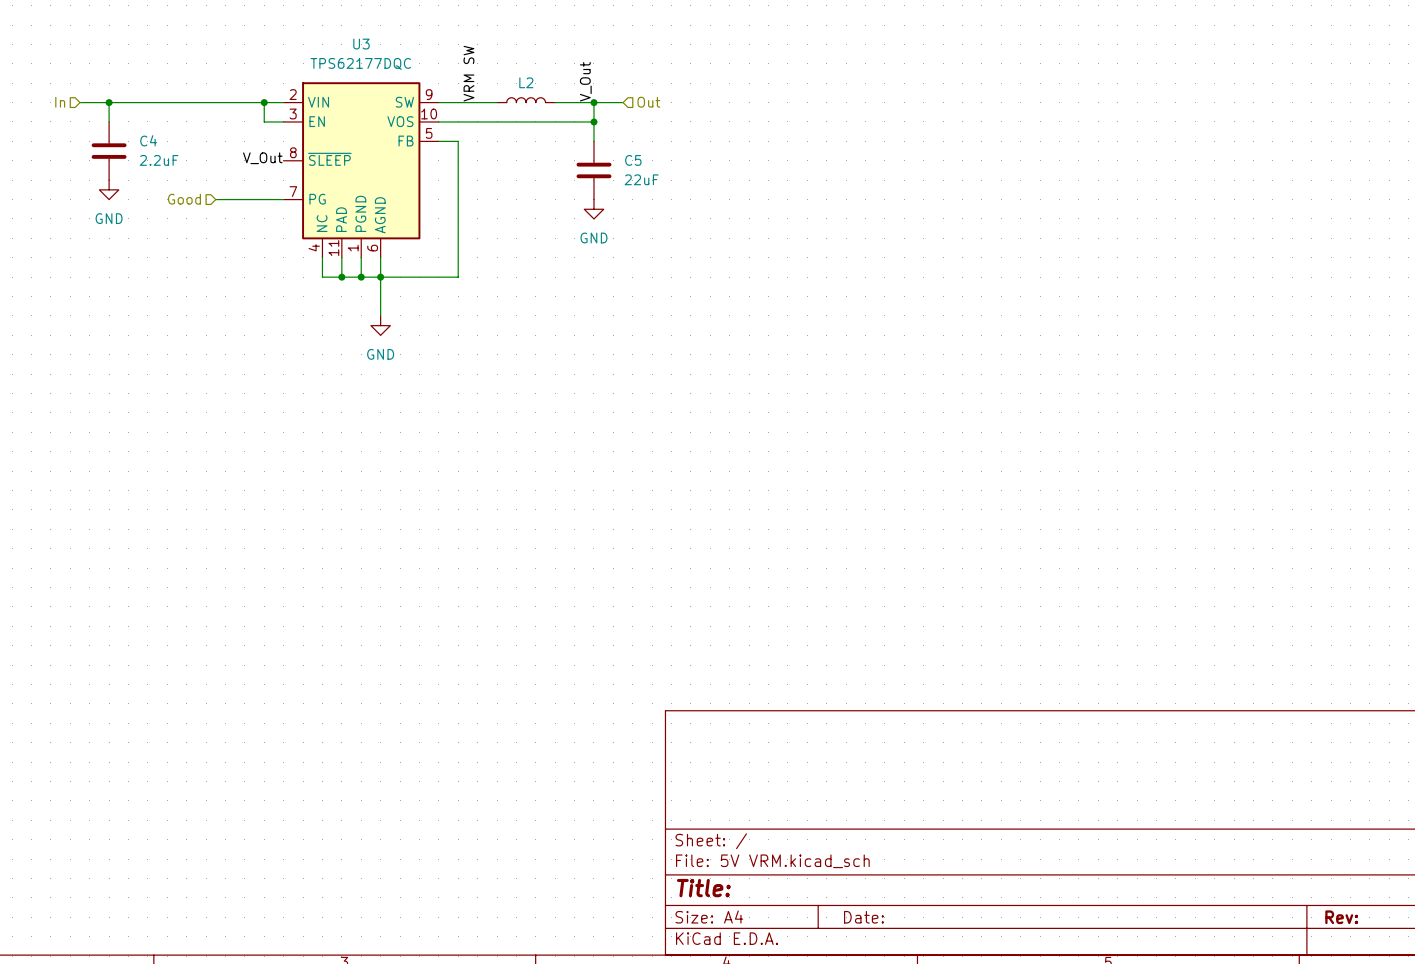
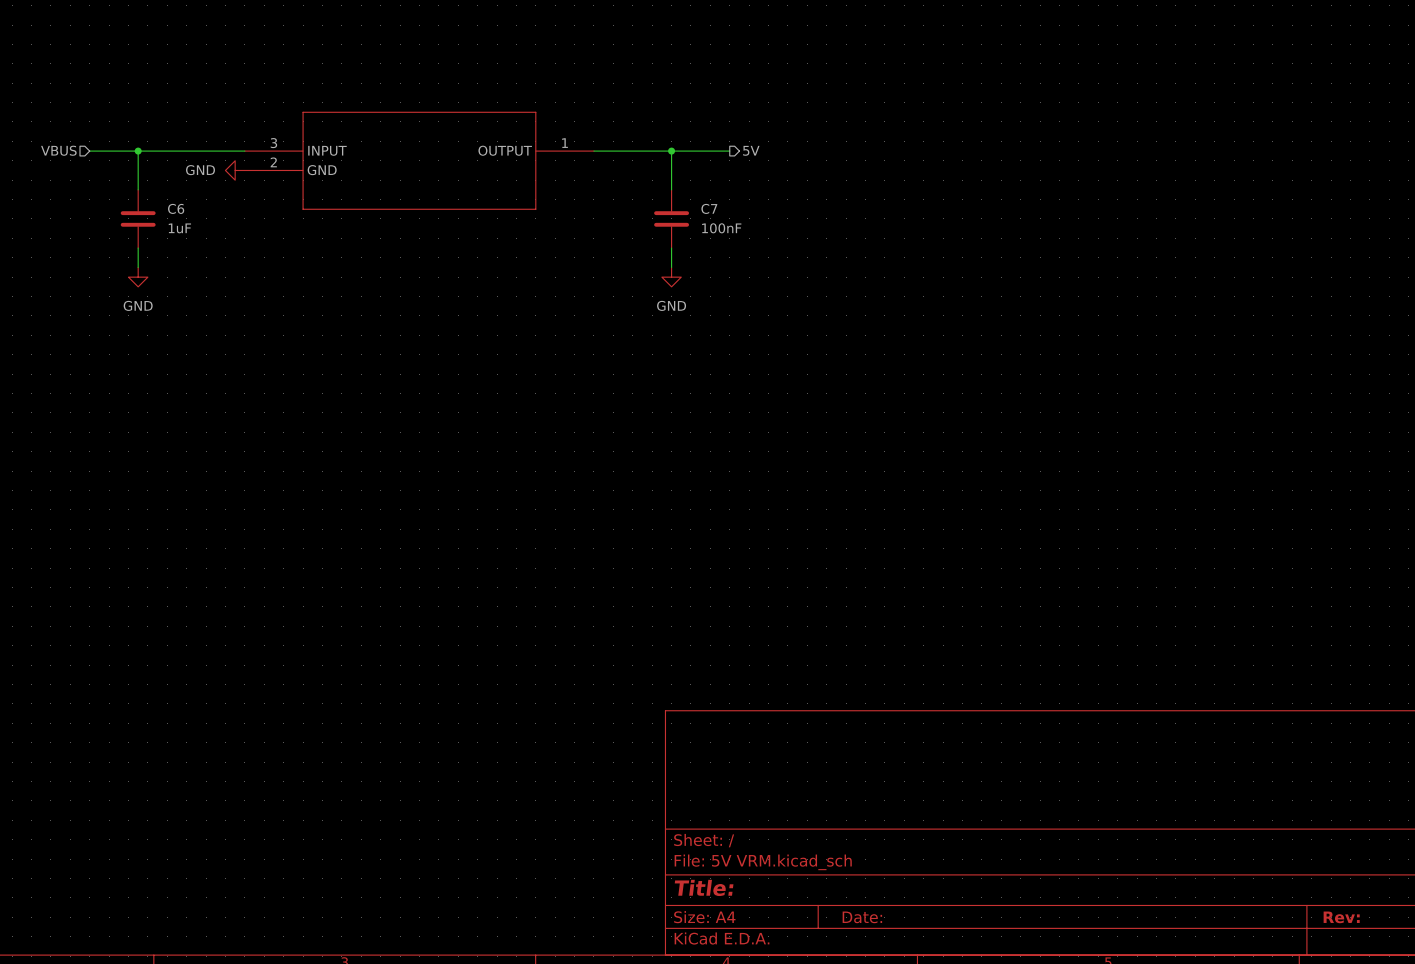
label: VRM SW (468, 73) -> none
label: V_Out (585, 81) -> none
L2: (526, 100) -> none
hierarchical label: In (60, 102) -> none
wire: (79, 102) (283, 102) -> none
wire: (109, 102) (109, 121) -> (138, 248) (138, 267)
junction: (109, 102) -> none
wire: (264, 102) (264, 121) (283, 121) -> none
junction: (264, 102) -> none
wire: (438, 102) (497, 102) -> none
wire: (555, 102) (623, 102) -> none
wire: (593, 102) (593, 141) -> (671, 151) (671, 189)
junction: (593, 102) -> none
hierarchical label: Out (648, 102) -> none
wire: (438, 121) (593, 121) -> none
junction: (593, 121) -> none
wire: (438, 141) (458, 141) (458, 277) (322, 277) (322, 257) -> none
hierarchical label: none -> VBUS (58, 150)
hierarchical label: none -> 5V (751, 150)
wire: none -> (89, 151) (244, 151)
C4: 2.2uF (109, 151) -> none
wire: none -> (138, 151) (138, 189)
junction: none -> (138, 151)
wire: none -> (593, 151) (729, 151)
junction: none -> (671, 151)
label: V_Out (262, 158) -> none
part: none -> (419, 160)
U3: TPS62177DQC (361, 169) -> none
power symbol: none -> GND (235, 170)
C5: 22uF (593, 170) -> none
power symbol: GND (109, 189) -> none
hierarchical label: Good (184, 199) -> none
wire: (215, 199) (283, 199) -> none
power symbol position: GND (593, 209) -> GND (671, 277)
C6: none -> 1uF (138, 218)
C7: none -> 100nF (671, 218)
wire: none -> (671, 248) (671, 267)
wire: (341, 257) (341, 277) -> none
wire: (361, 257) (361, 277) -> none
wire: (380, 257) (380, 315) -> none
power symbol: none -> GND (138, 277)
junction: (341, 277) -> none
junction: (361, 277) -> none
junction: (380, 277) -> none
power symbol: GND (380, 325) -> none

